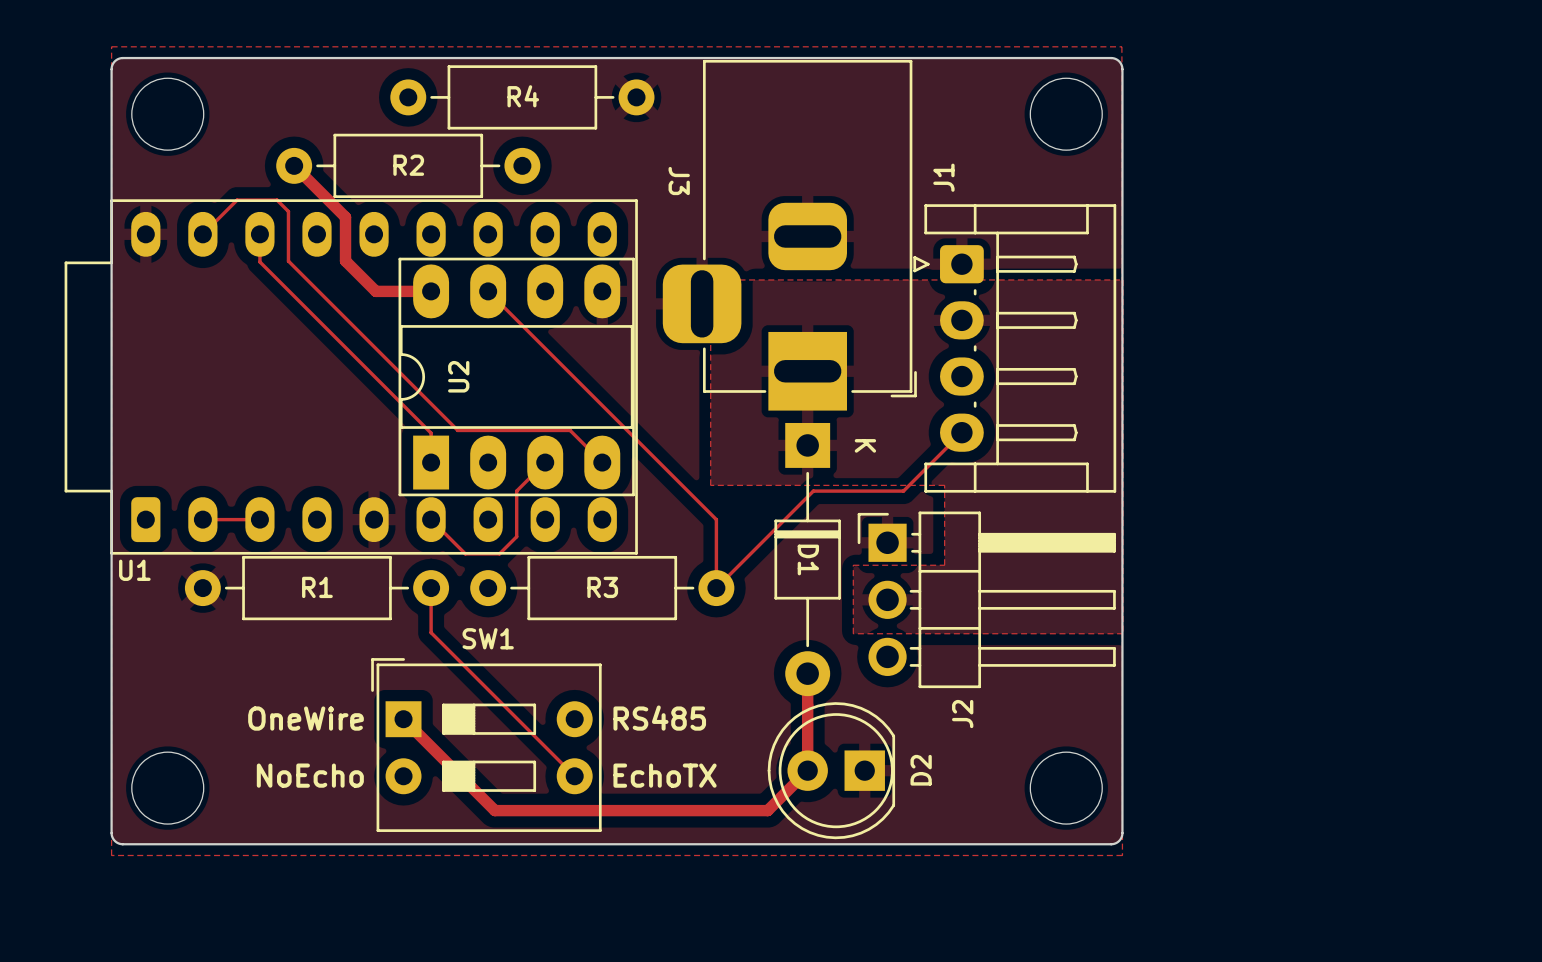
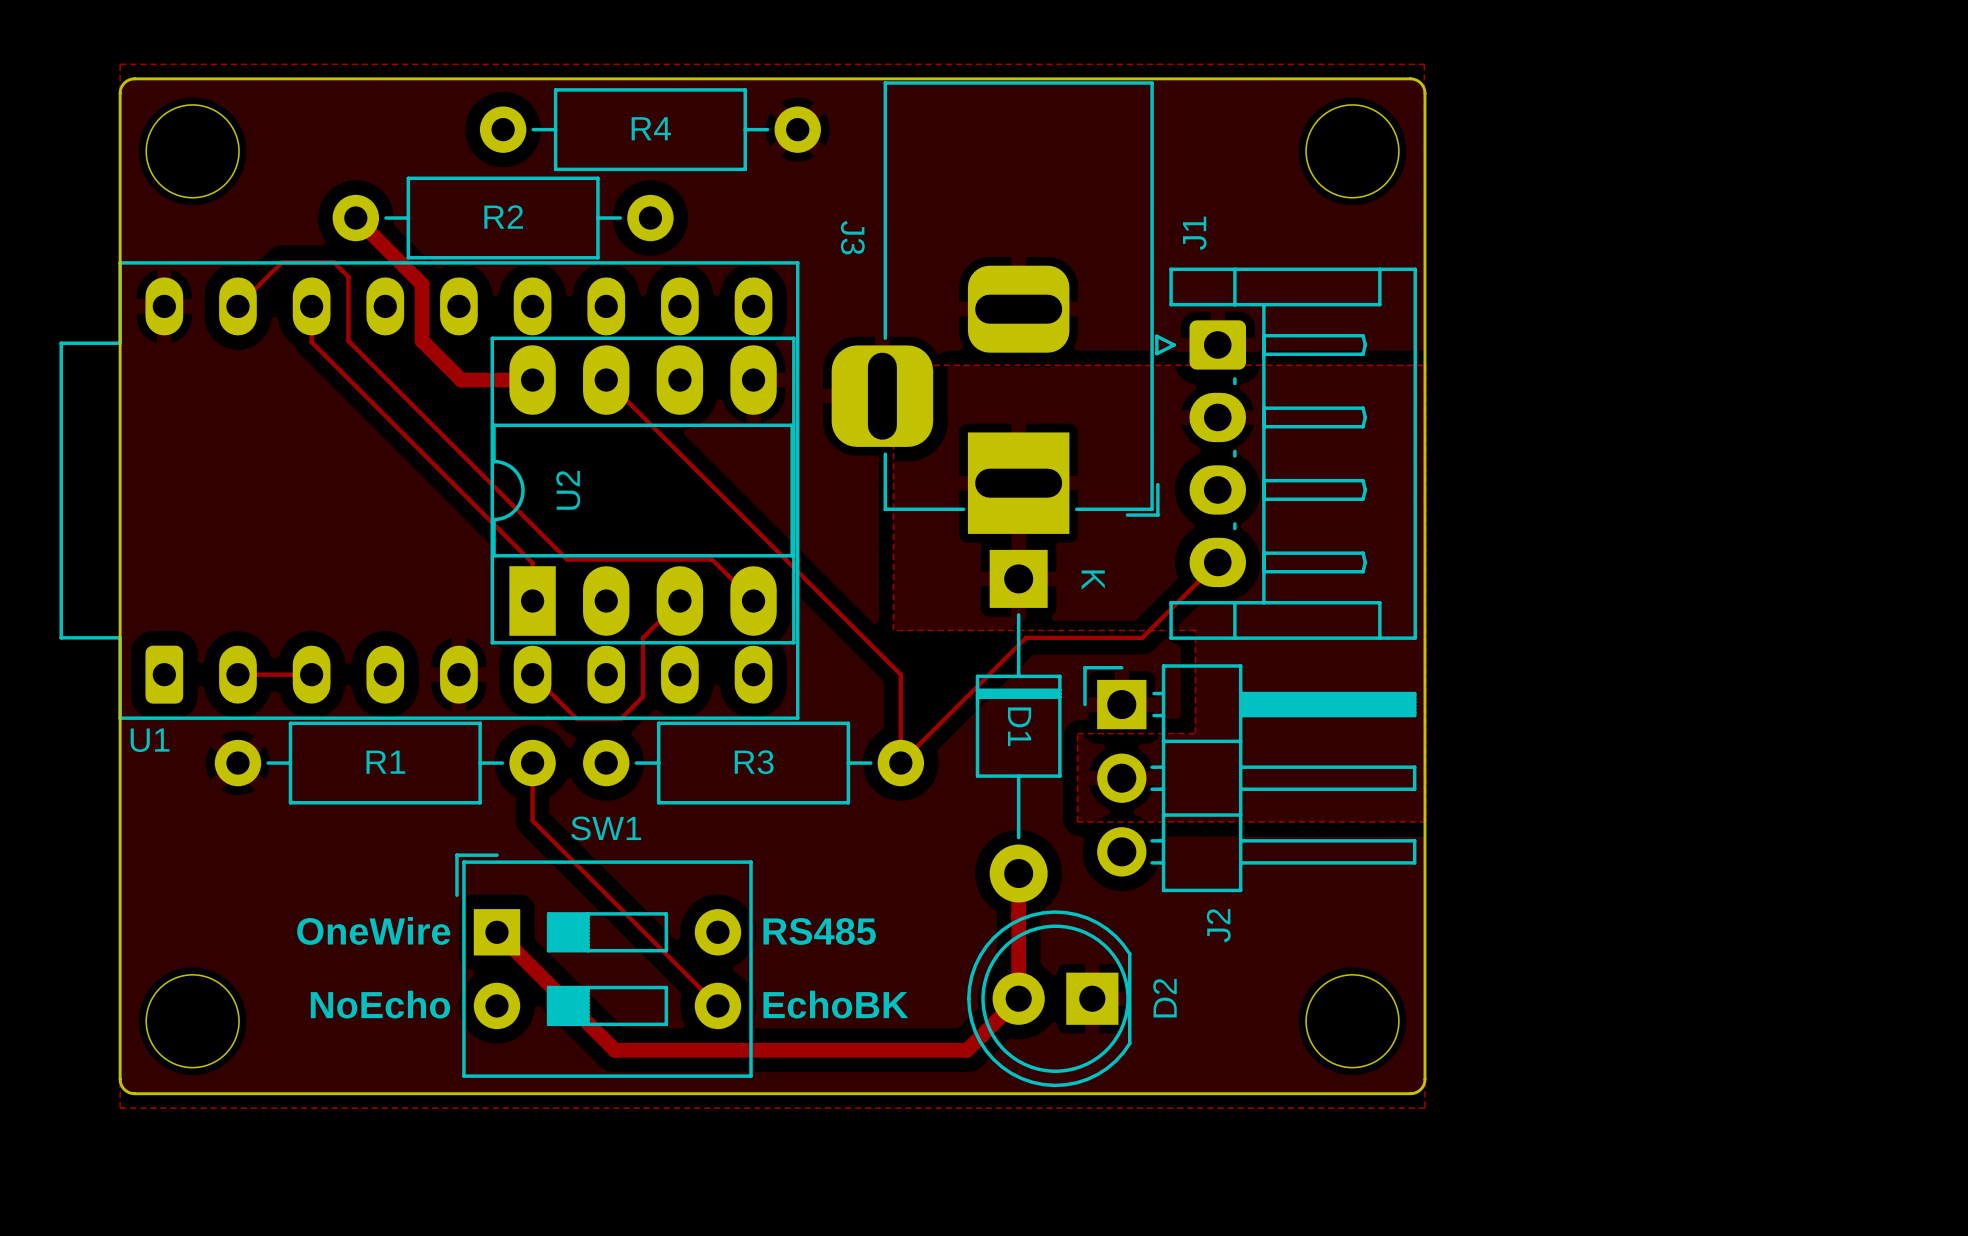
text: EchoTX (665, 775) -> EchoBK (835, 1004)

